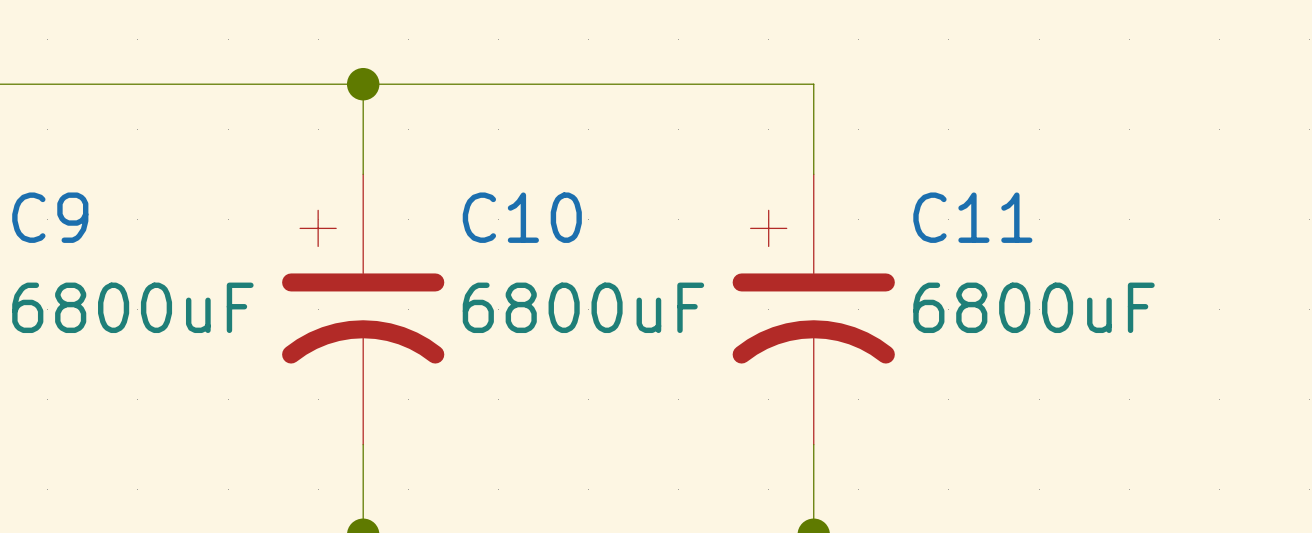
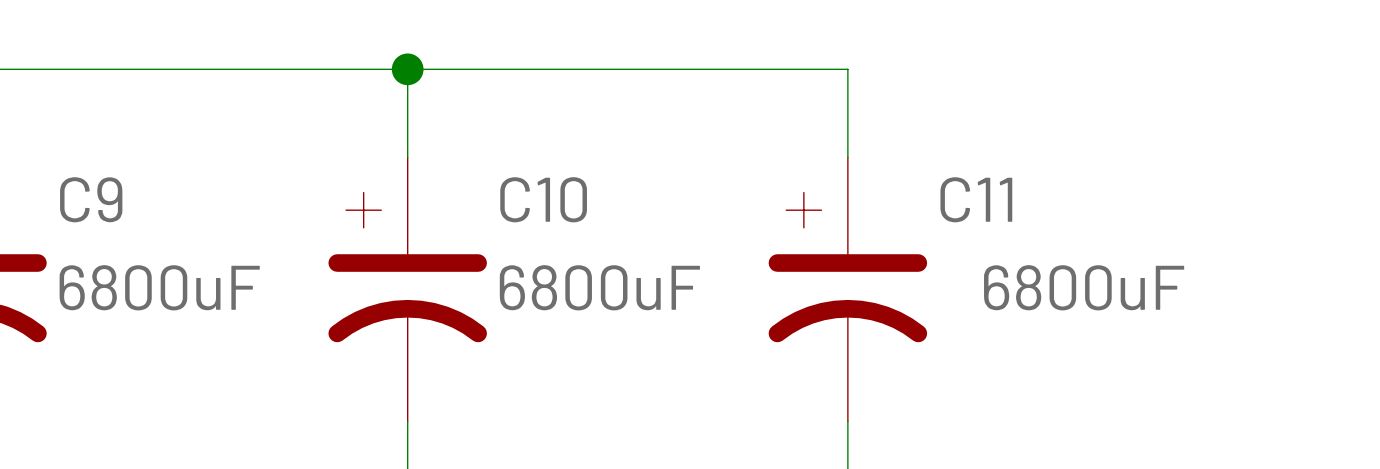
C11 value position: 6800uF (1033, 307) -> 6800uF (1084, 287)

